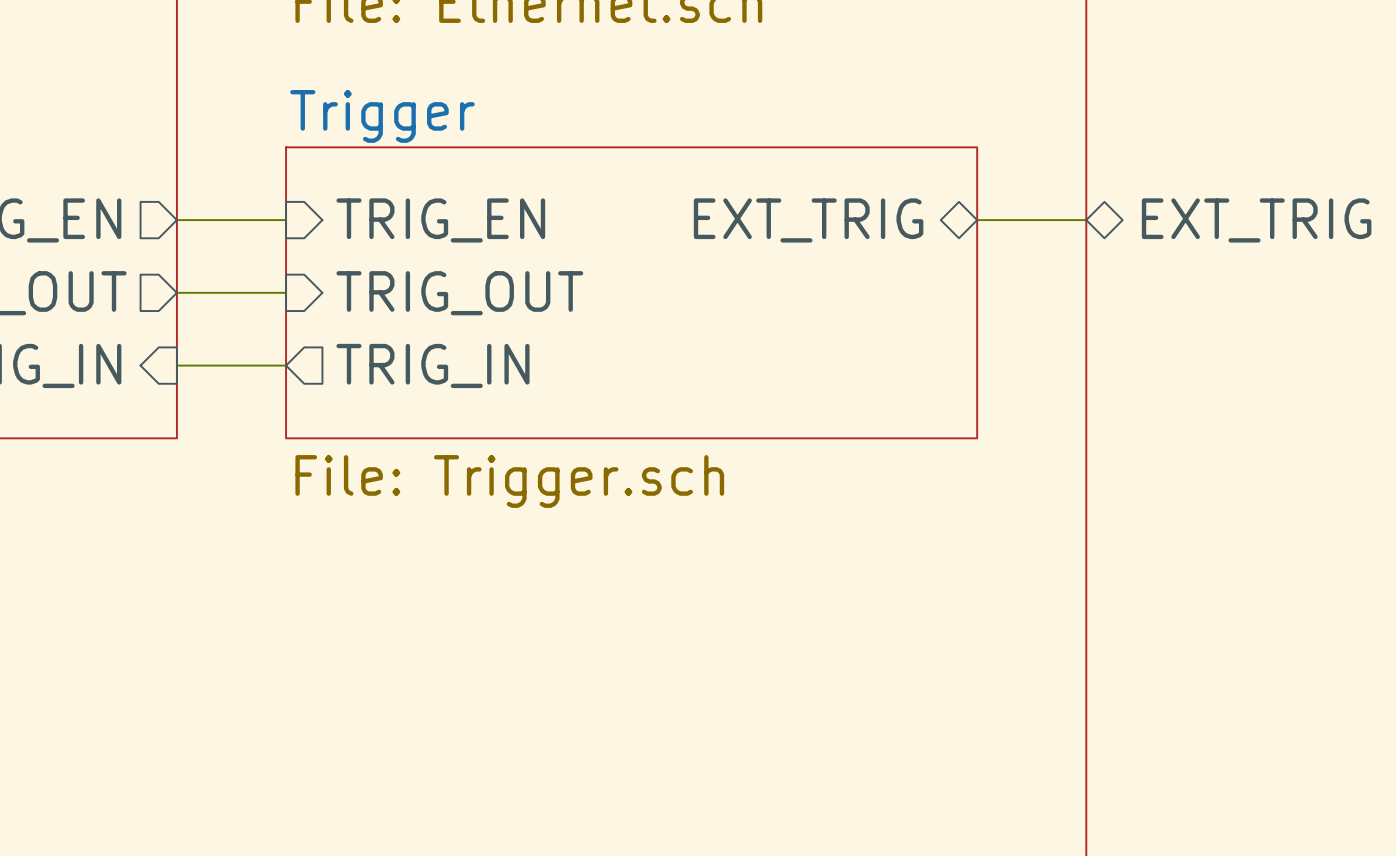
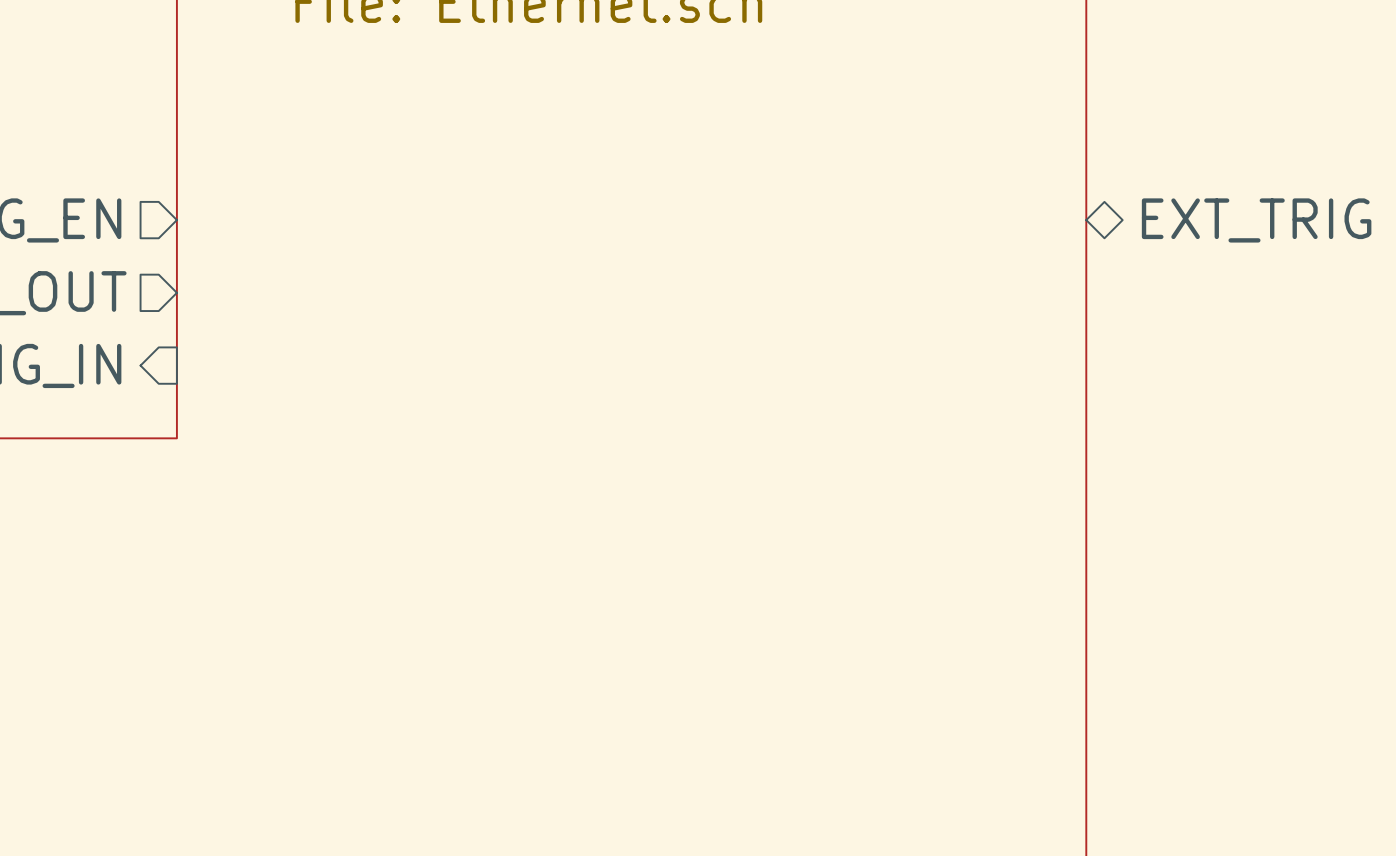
wire: (176, 220) (286, 220) -> none
sheet pin: TRIG_EN (440, 220) -> none
sheet pin: EXT_TRIG (808, 220) -> none
wire: (977, 220) (1086, 220) -> none
wire: (176, 292) (286, 292) -> none
sheet Trigger: File: Trigger.sch (631, 292) -> none
sheet pin: TRIG_OUT (459, 293) -> none
wire: (176, 365) (286, 365) -> none
sheet pin: TRIG_IN (432, 365) -> none

